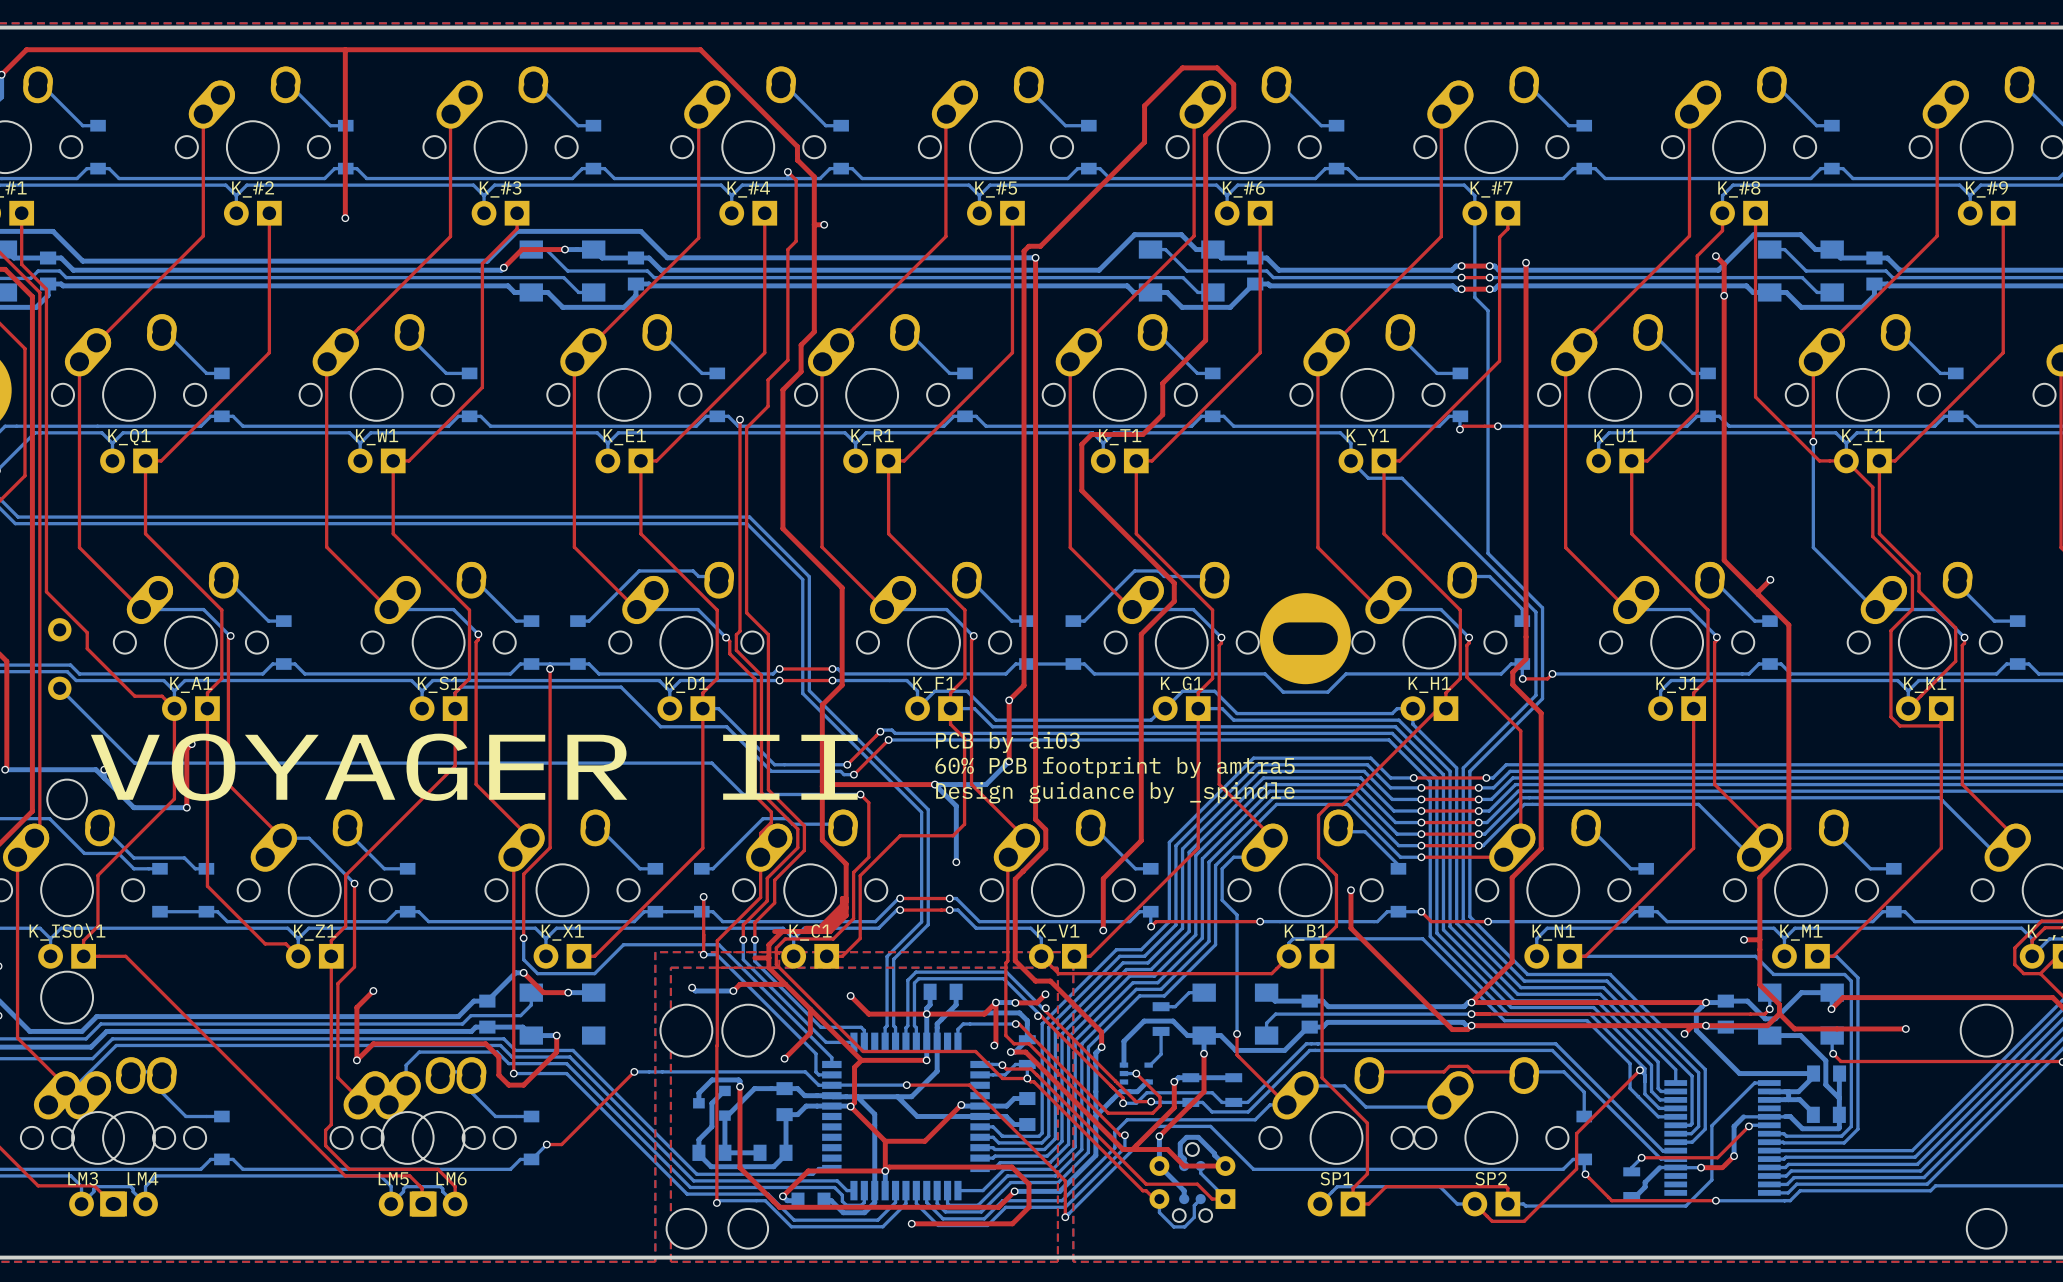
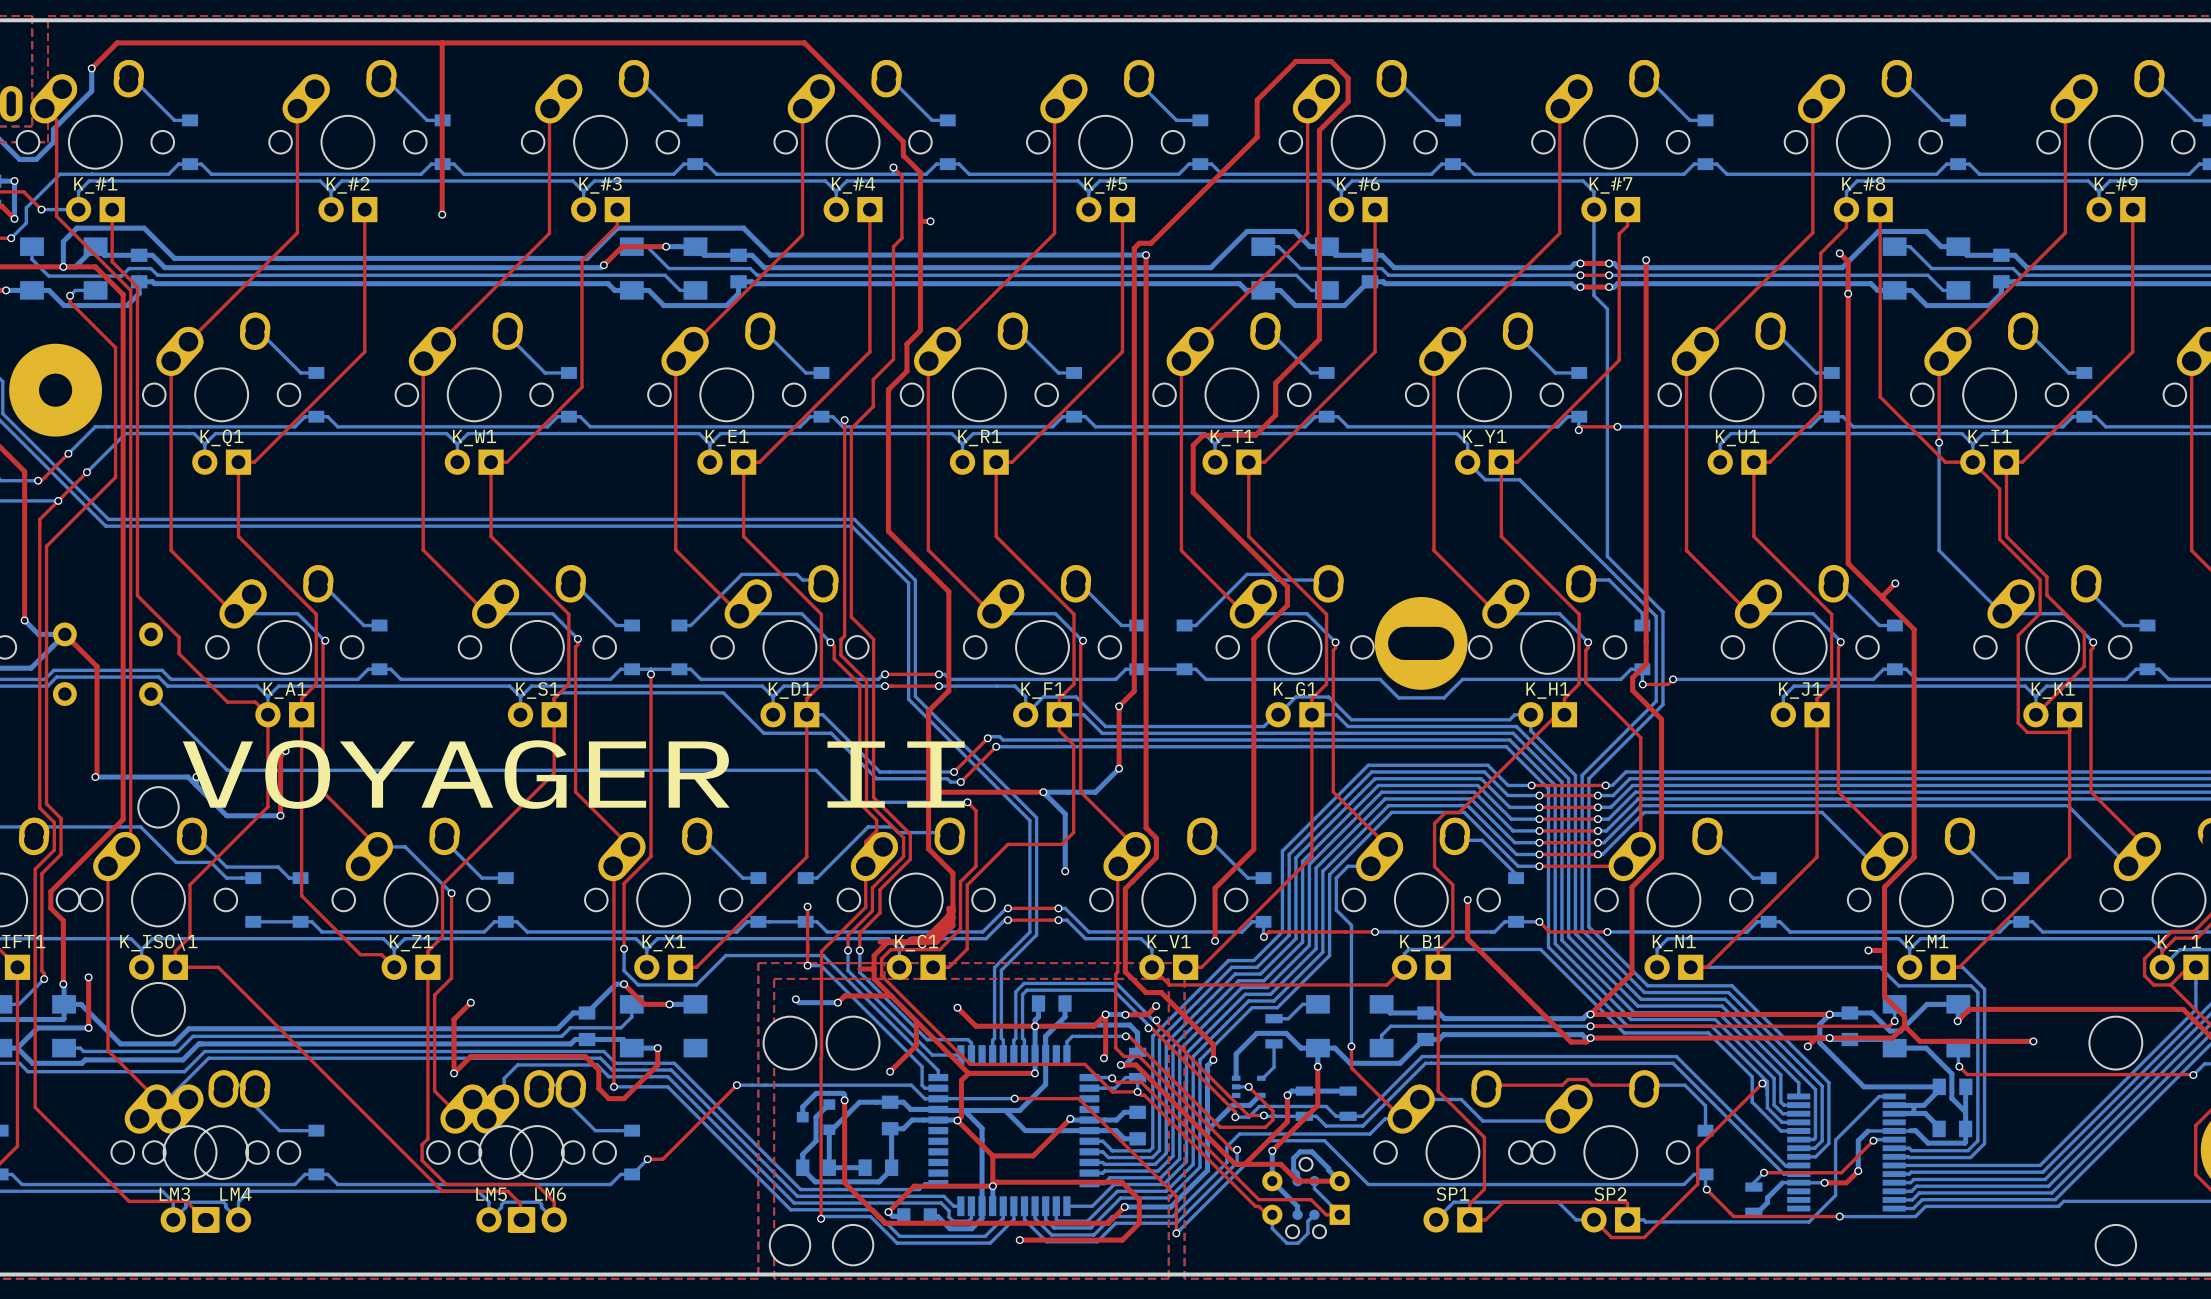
text: PCB by ai03 (1007, 742) -> none
text: 60% PCB footprint by amtra5 (1115, 767) -> none
text: Design guidance by _spindle (1115, 792) -> none

